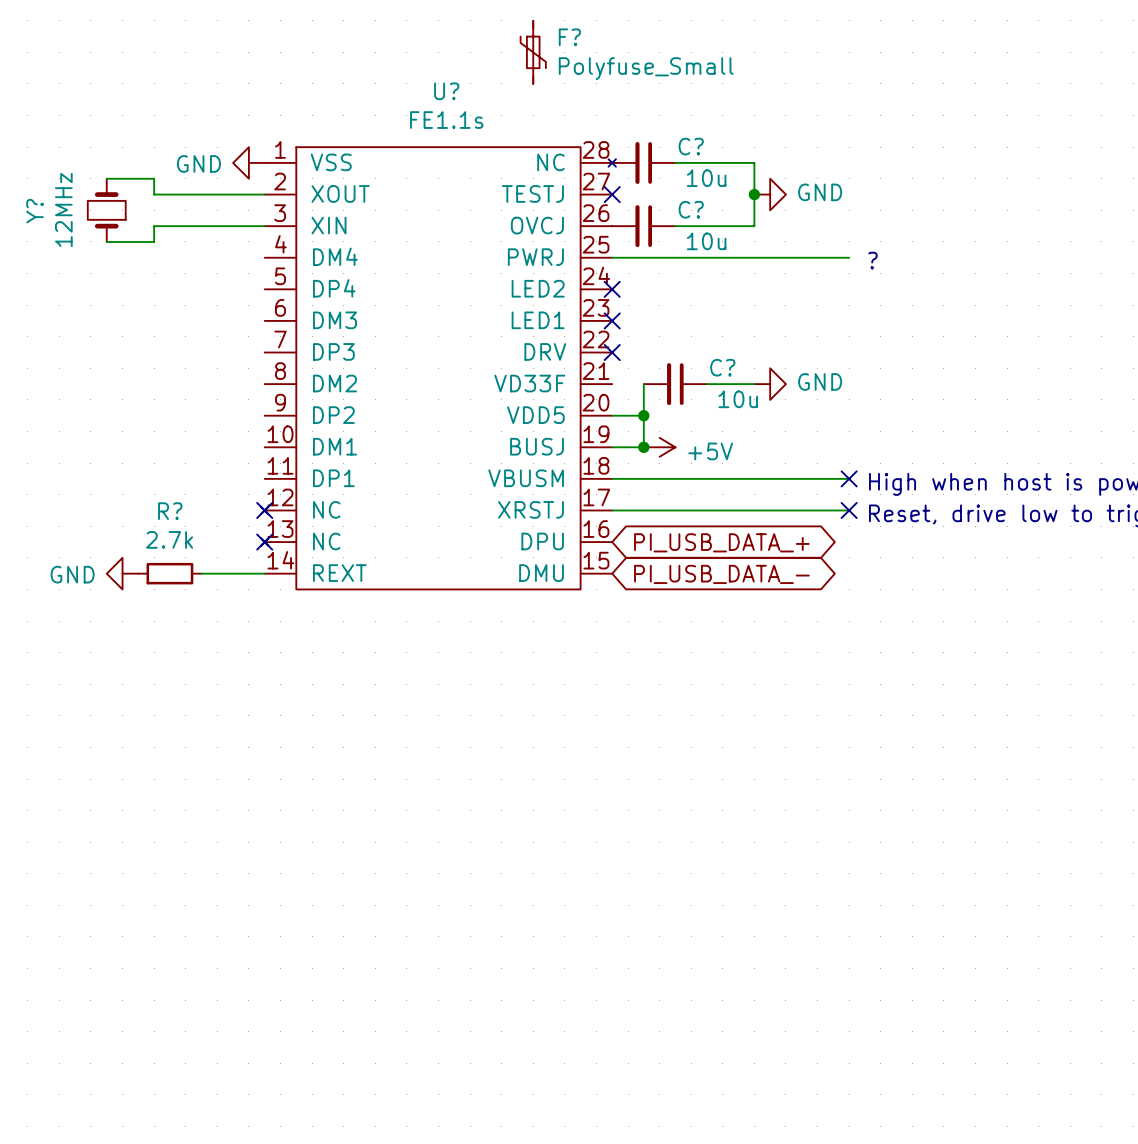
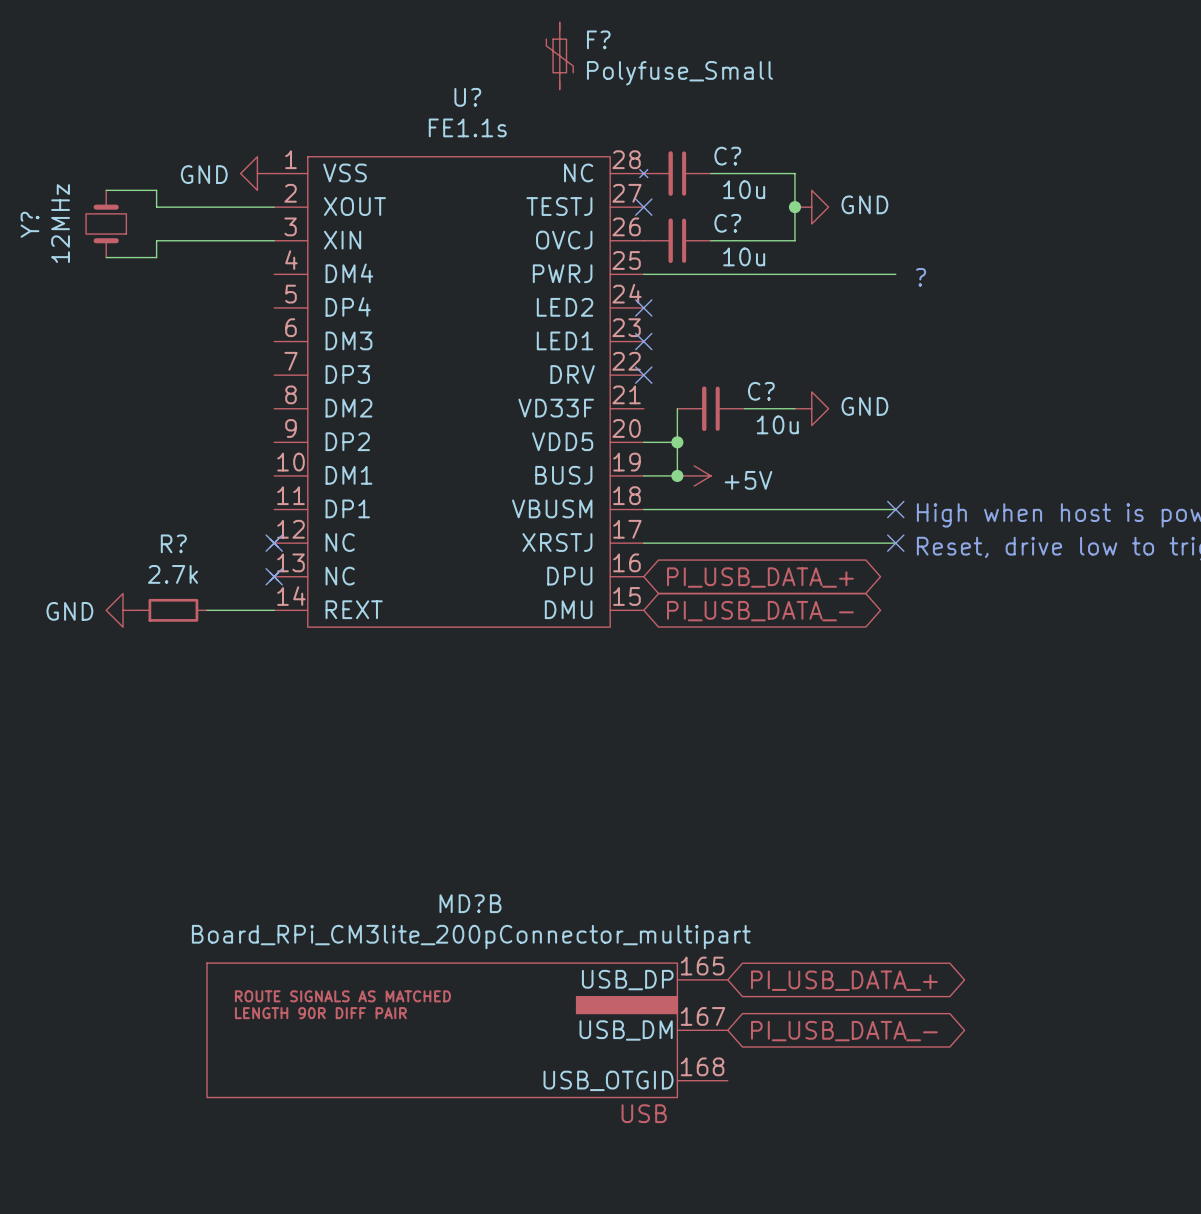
global label: none -> PI_USB_DATA_+ (844, 980)
MD?B: none -> Board_RPi_CM3lite_200pConnector_multipart (467, 1030)
global label: none -> PI_USB_DATA_- (844, 1031)

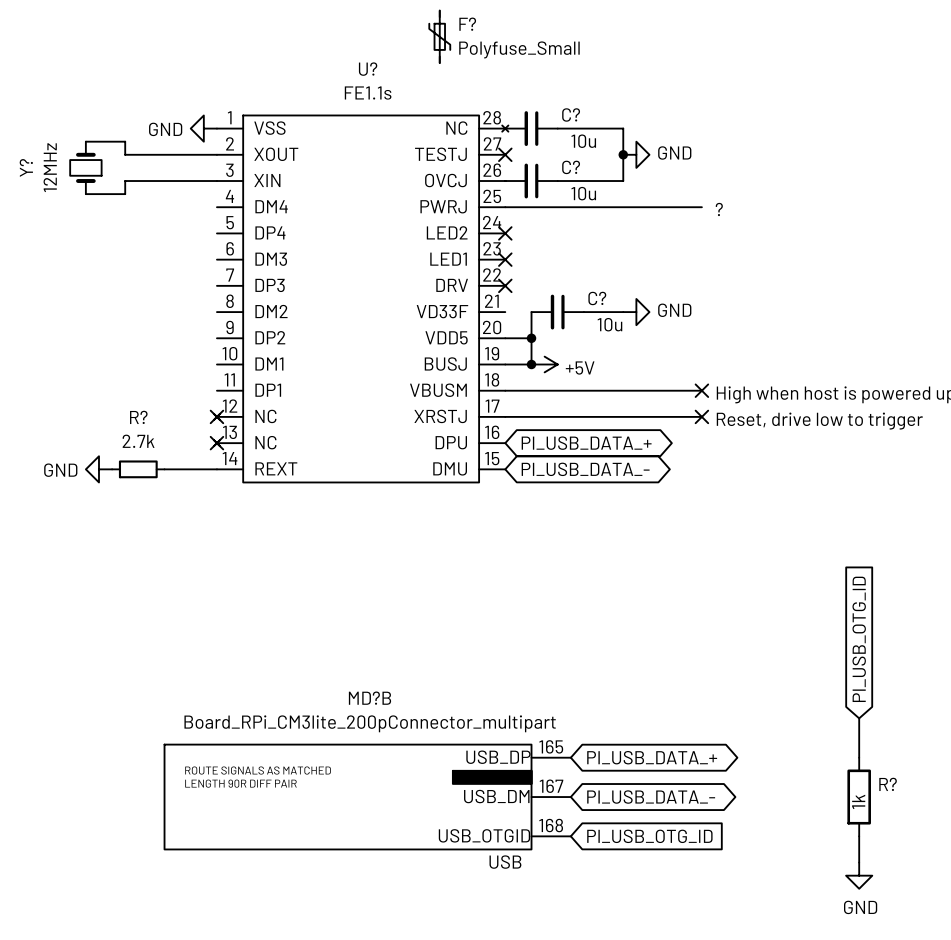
global label: none -> PI_USB_OTG_ID (859, 639)
wire: none -> (859, 718) (859, 757)
R?: none -> 1k (859, 797)
wire: none -> (859, 836) (859, 862)
global label: none -> PI_USB_OTG_ID (649, 836)
power symbol: none -> GND (859, 875)

